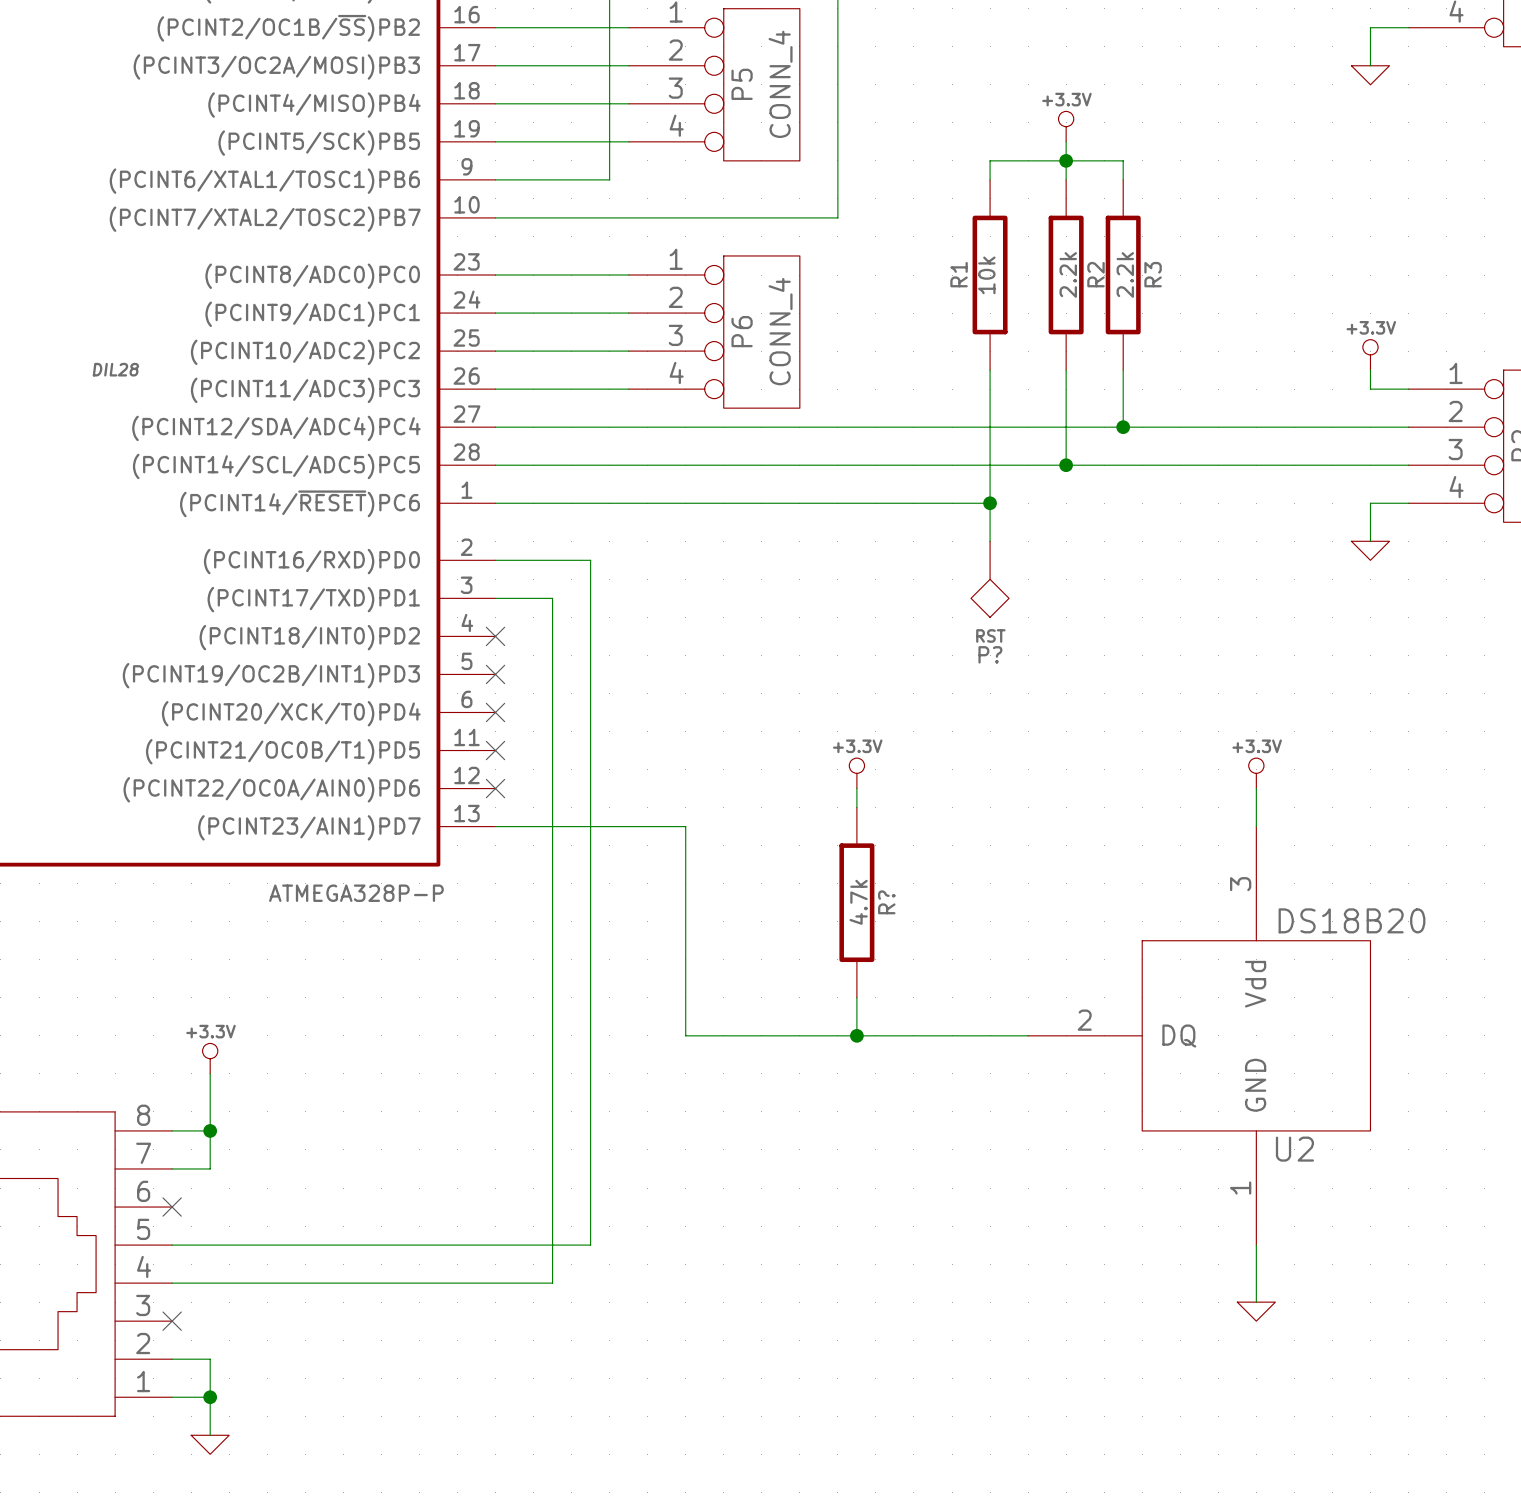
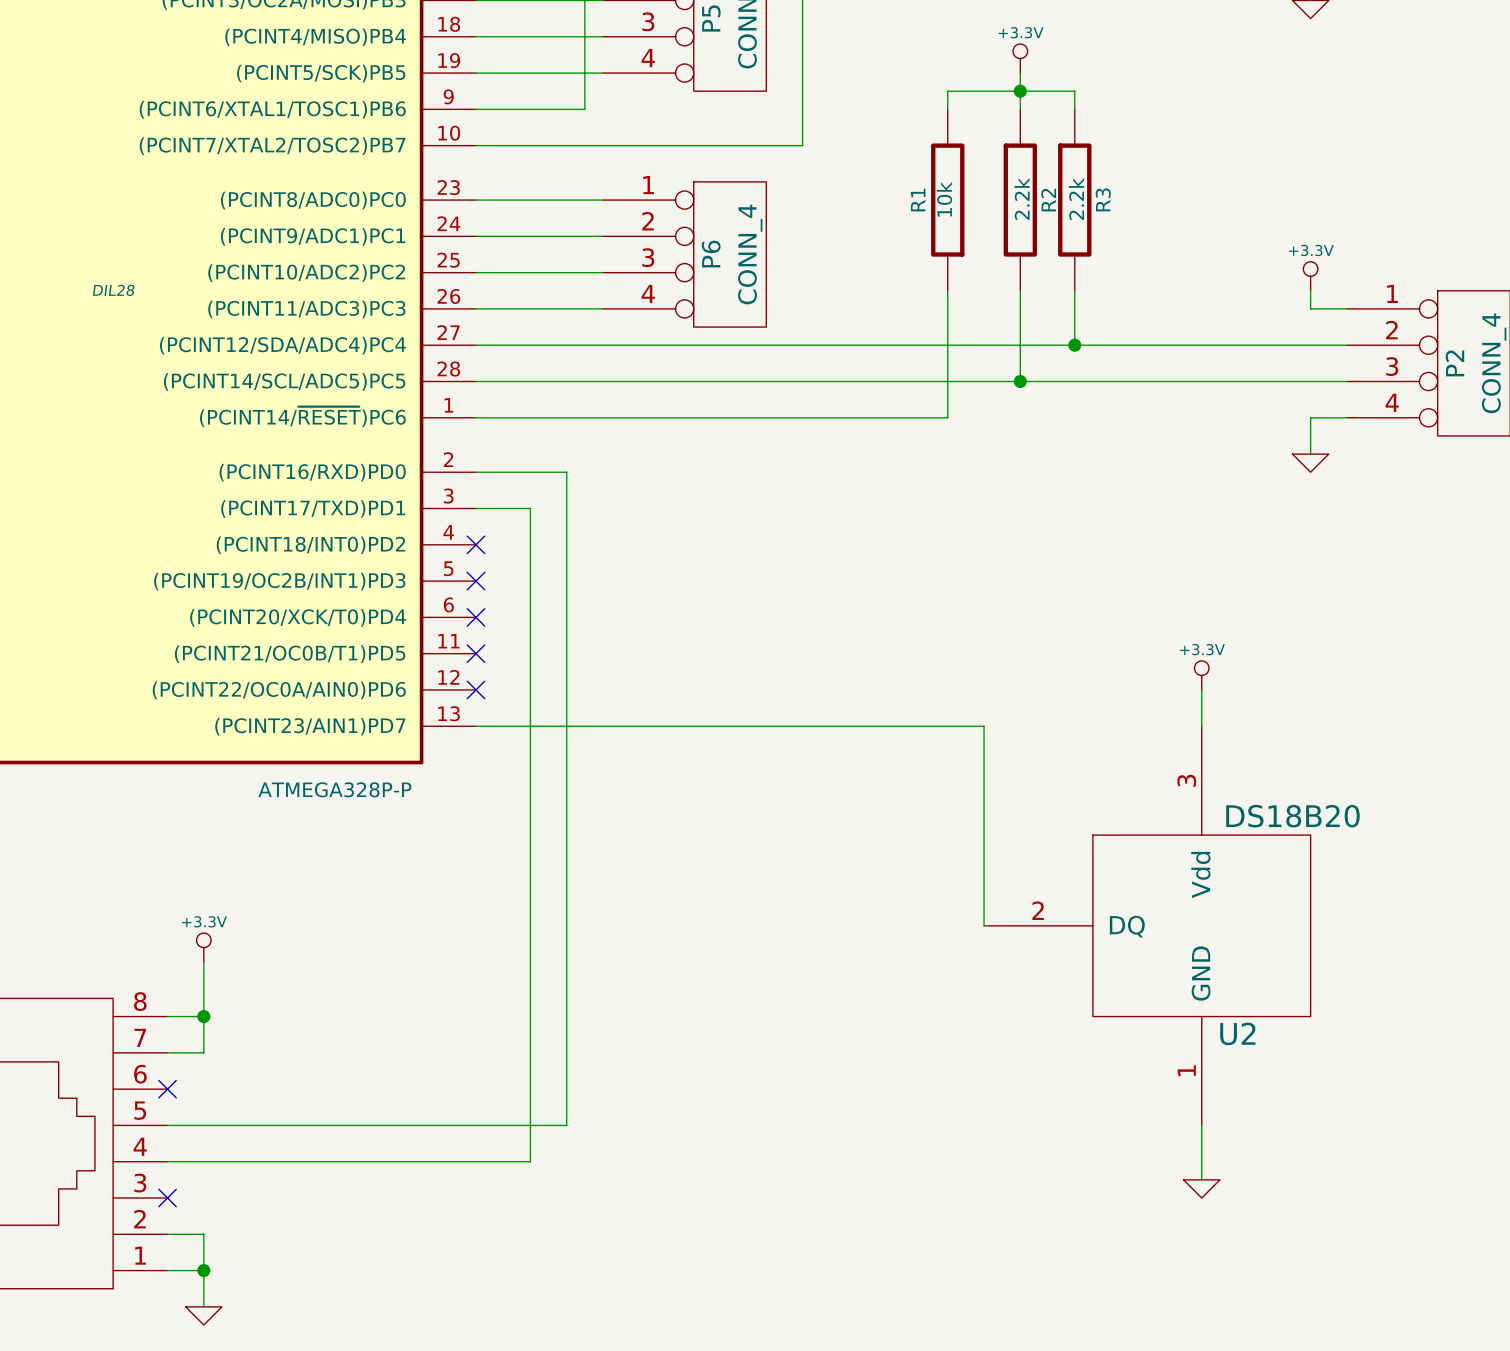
wire: (990, 503) (990, 541) -> none
junction: (990, 503) -> none
P?: RST (990, 579) -> none
power symbol: +3.3V (856, 773) -> none
wire: (856, 788) (856, 807) -> none
wire: (685, 826) (685, 1035) (1028, 1035) -> (657, 726) (984, 726) (984, 925)
R?: 4.7k (856, 902) -> none
wire: (856, 997) (856, 1035) -> none
junction: (856, 1035) -> none

